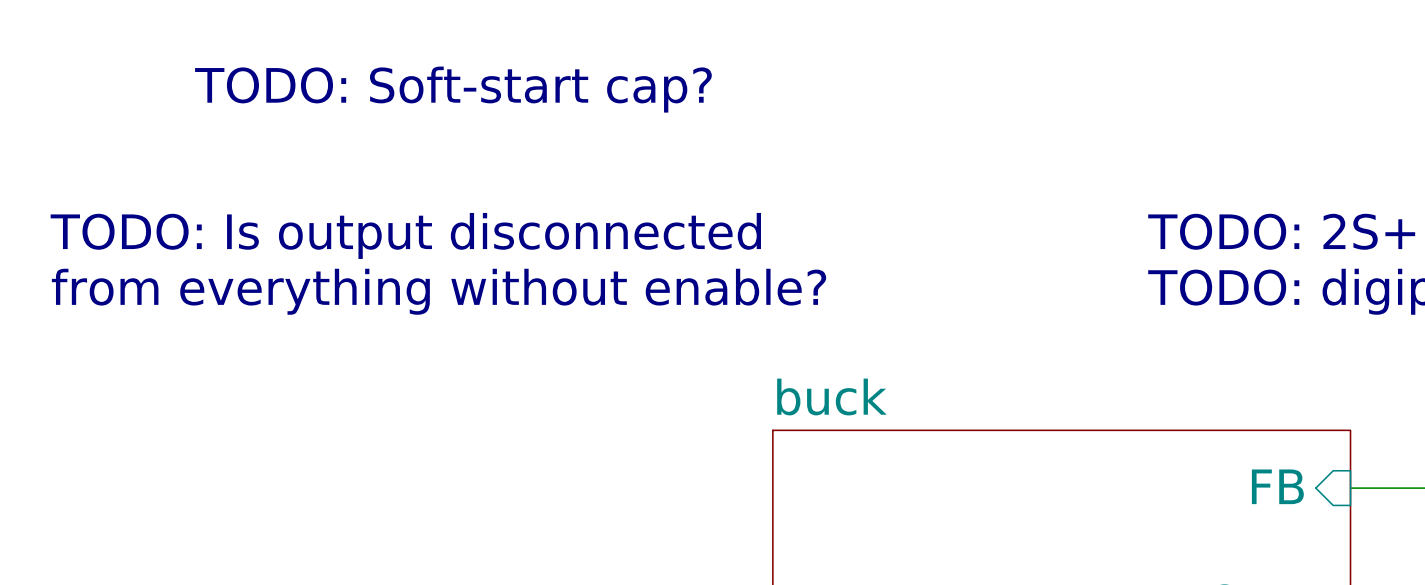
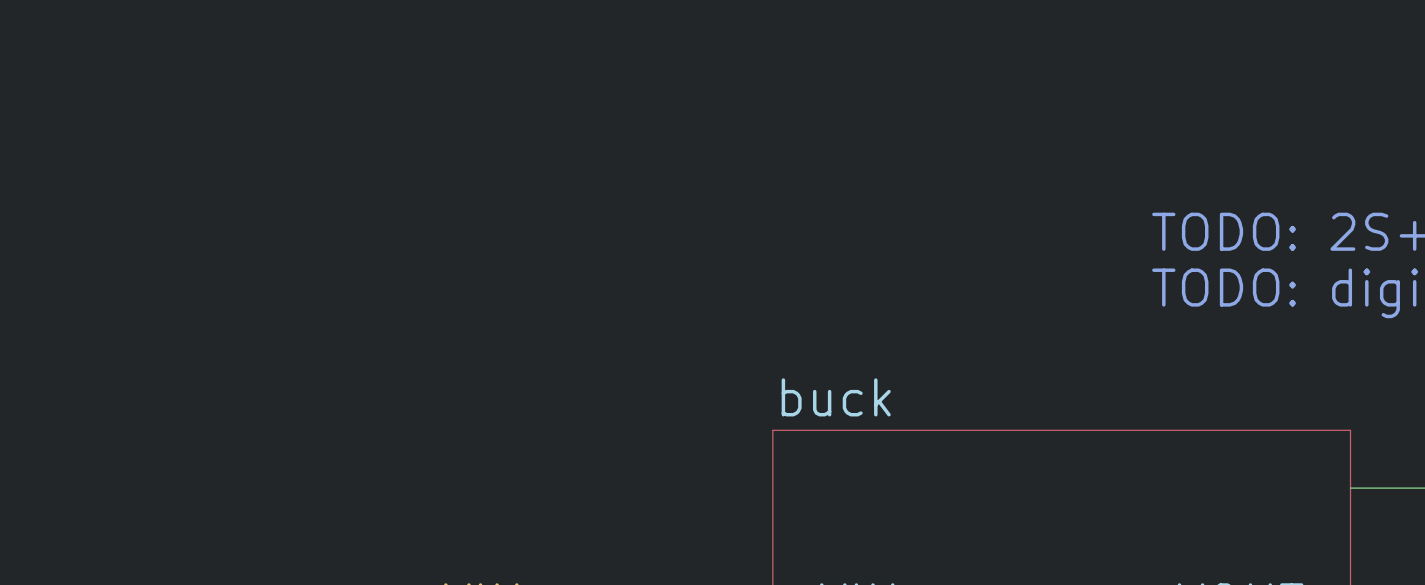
text: TODO: Soft-start cap? (453, 89) -> none
text: TODO: Is output disconnected (405, 235) -> none
text: from everything without enable? (439, 291) -> none
sheet pin: FB (1277, 486) -> none

